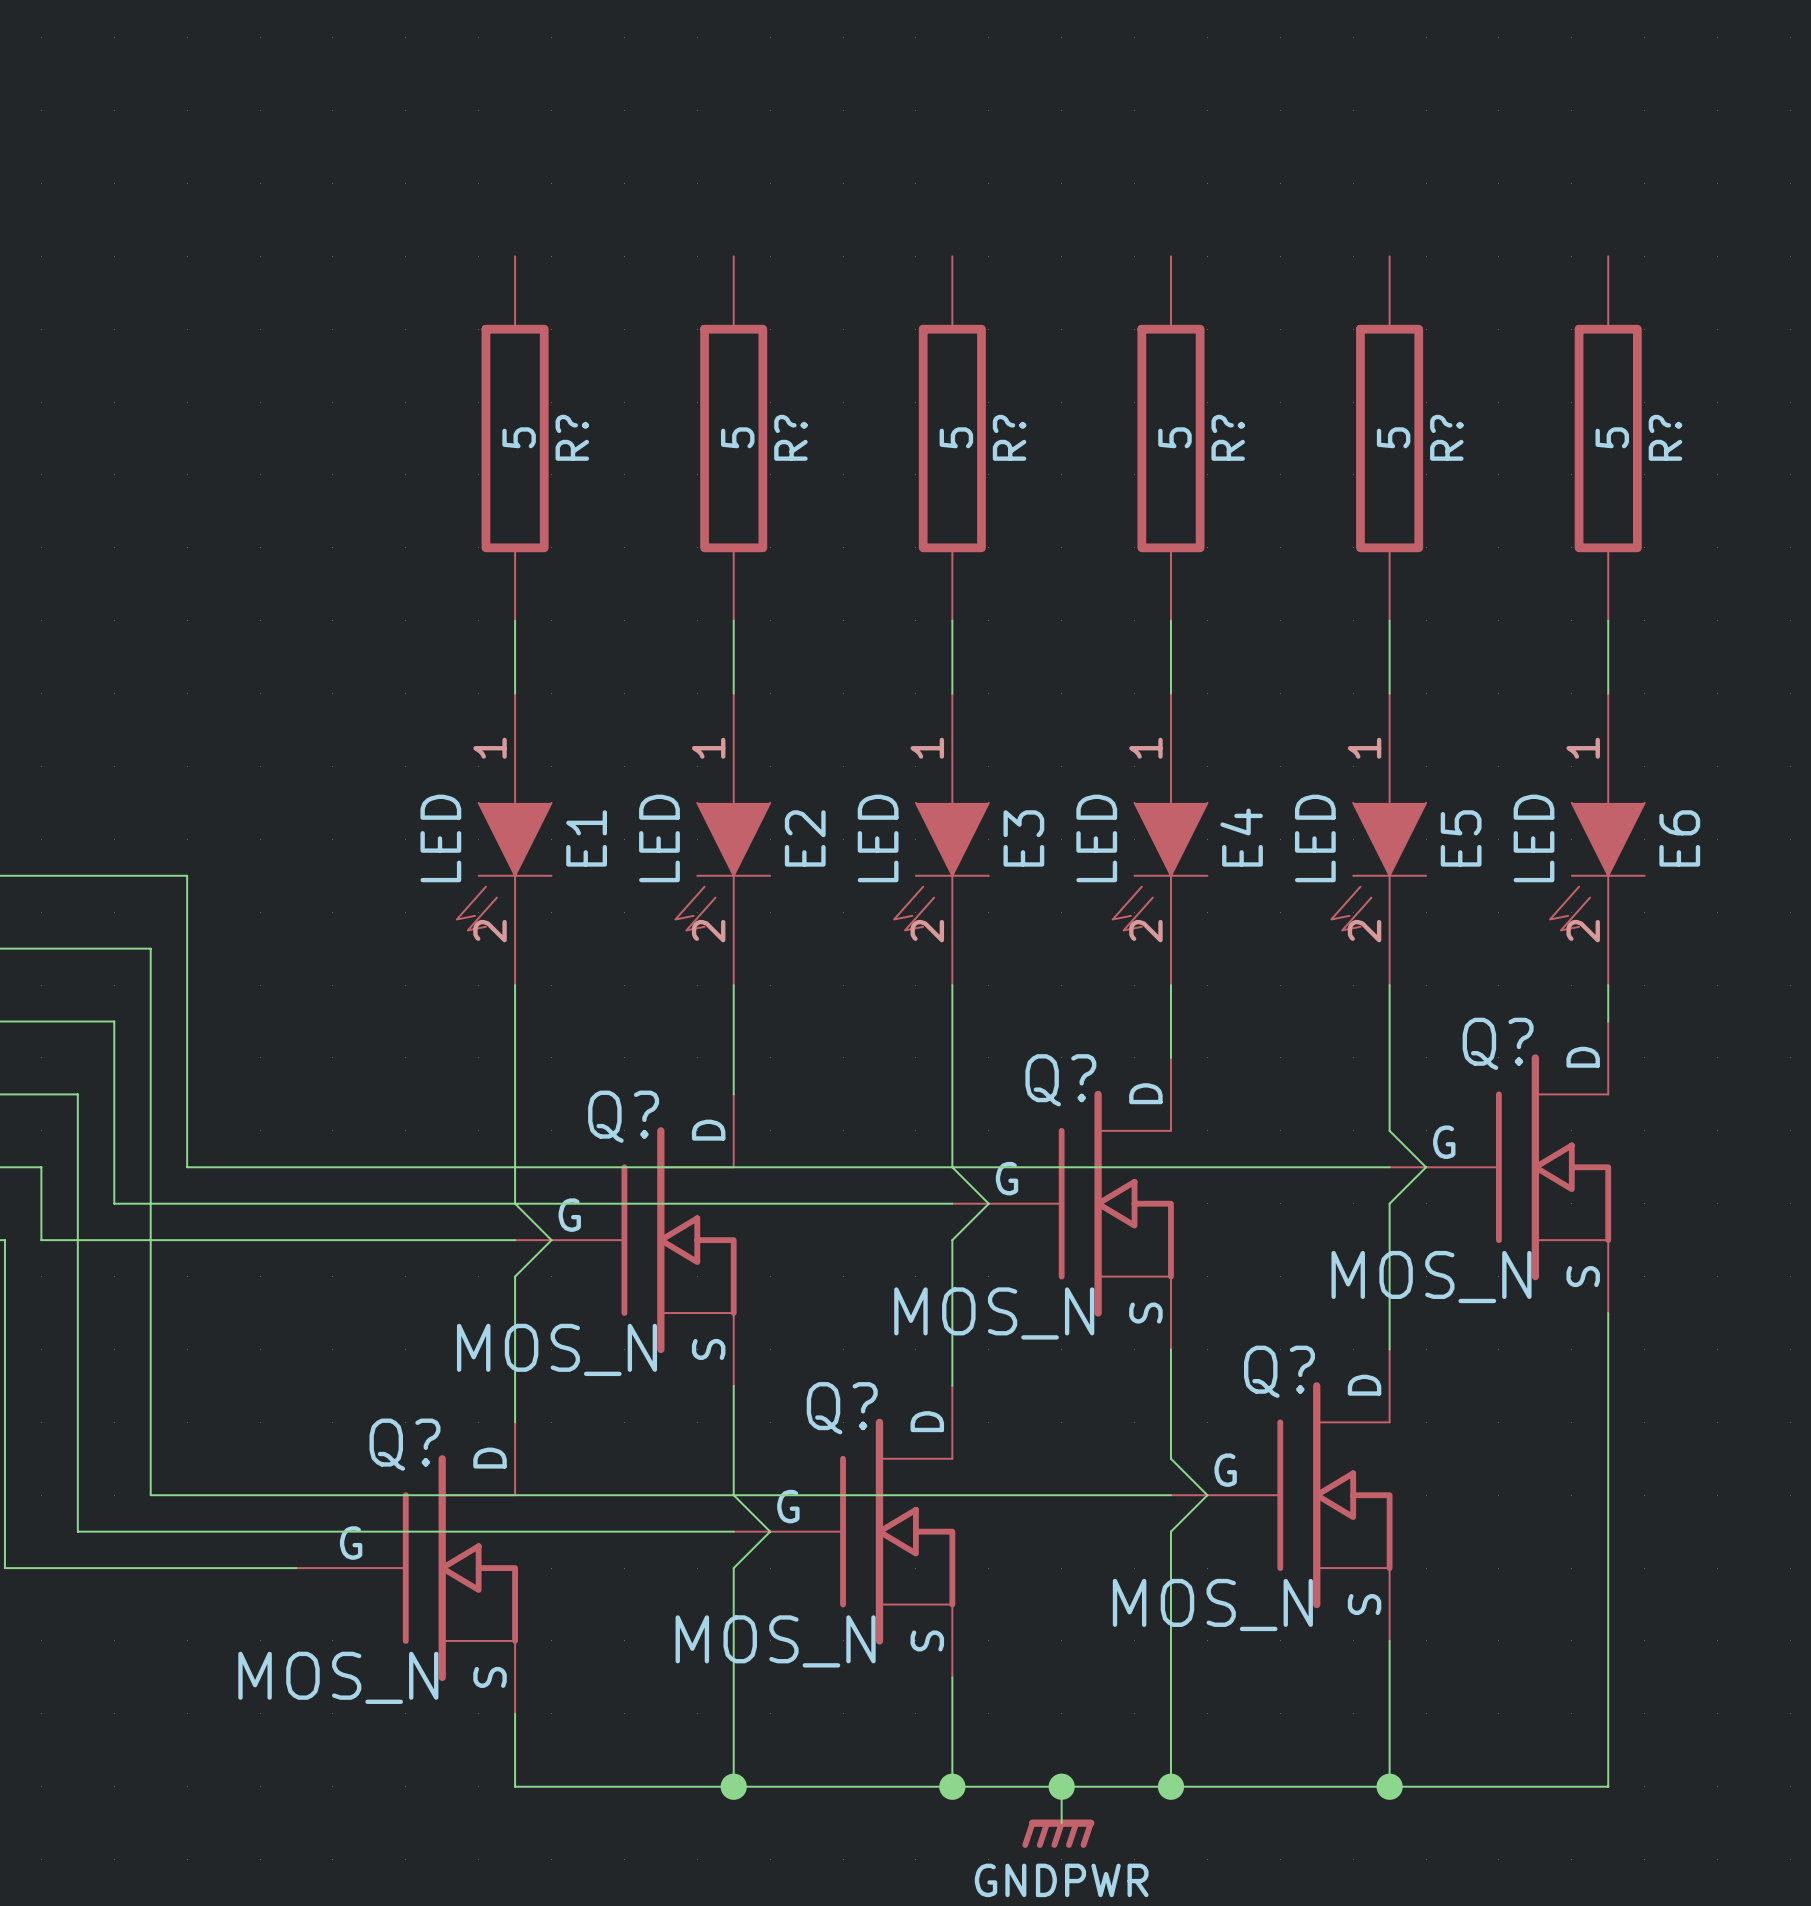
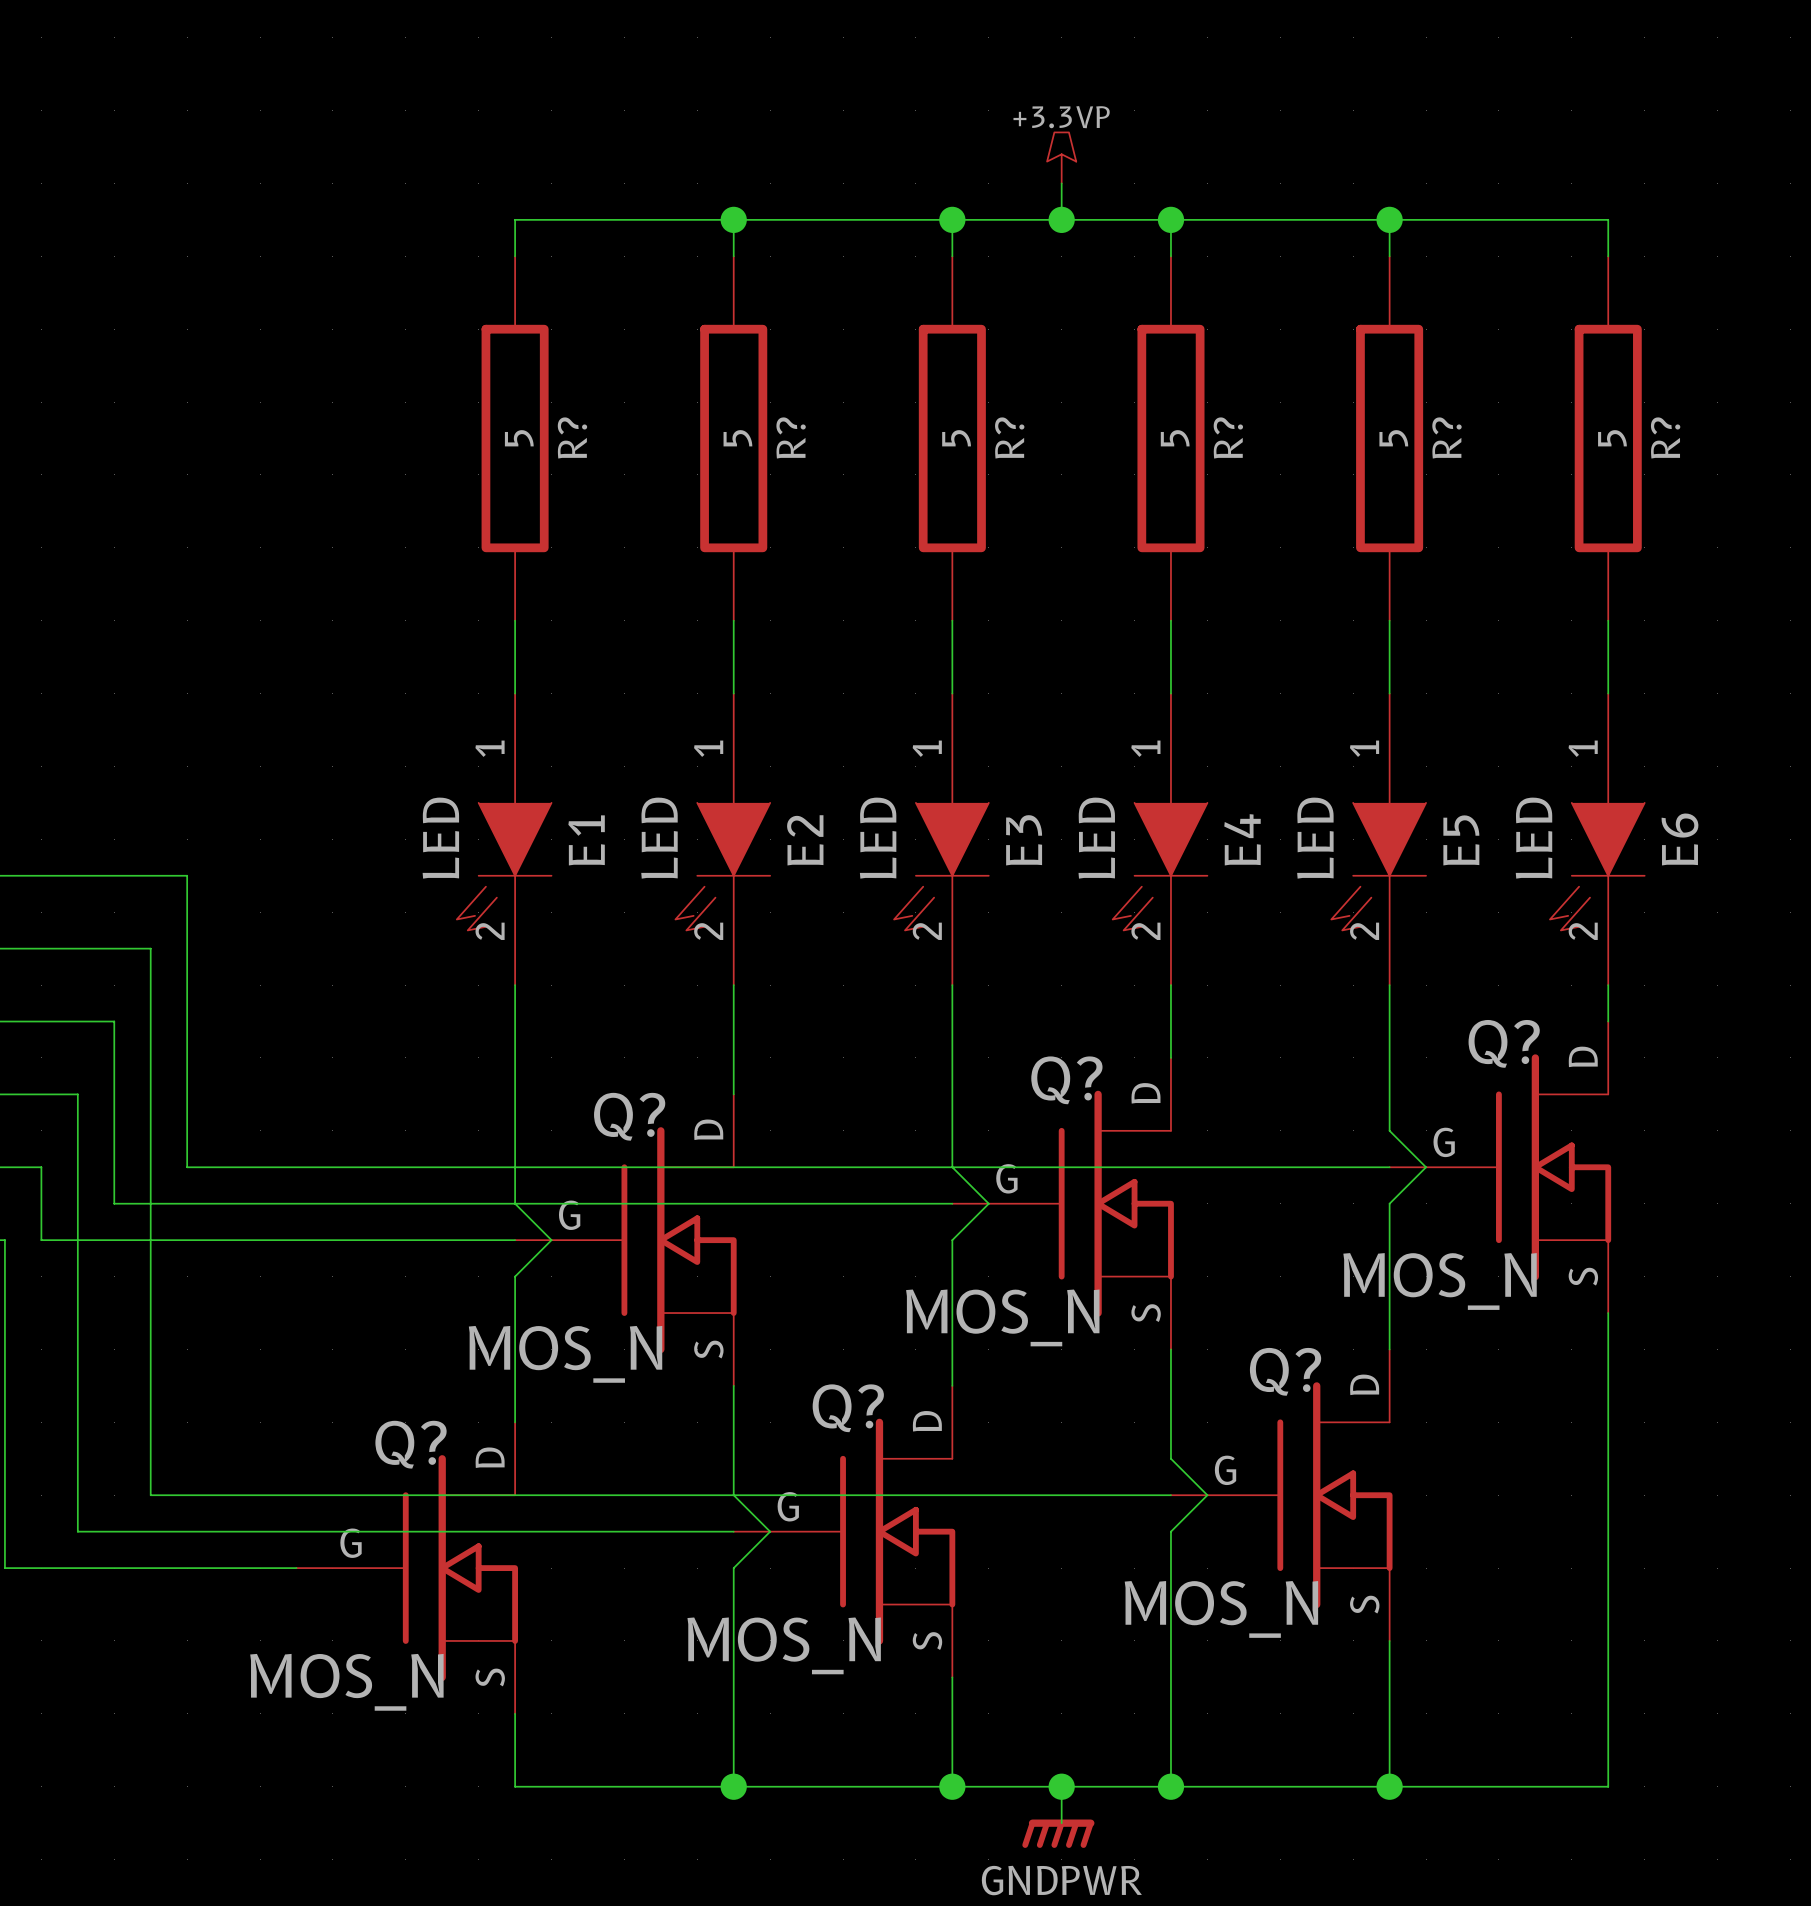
power symbol: none -> +3.3VP (1061, 157)
wire: none -> (1061, 183) (1061, 219)
wire: none -> (733, 219) (733, 256)
junction: none -> (733, 219)
wire: none -> (952, 219) (952, 256)
junction: none -> (952, 219)
junction: none -> (1061, 219)
wire: none -> (1170, 219) (1170, 256)
junction: none -> (1170, 219)
wire: none -> (1389, 219) (1389, 256)
junction: none -> (1389, 219)
wire: none -> (515, 256) (515, 219) (1608, 219) (1608, 256)

